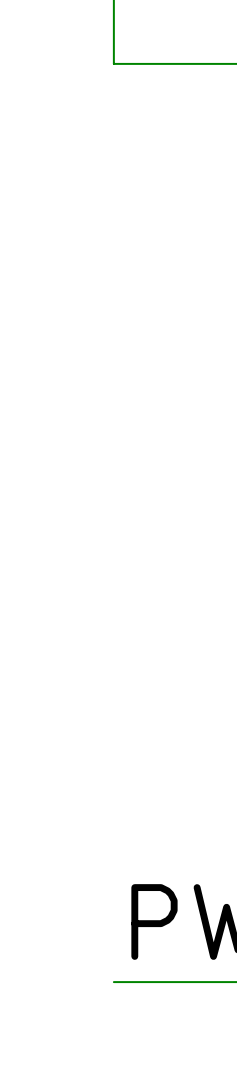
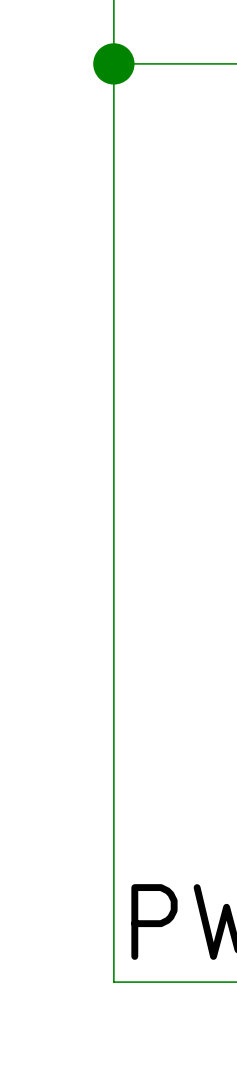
wire: none -> (113, 63) (113, 982)
junction: none -> (113, 63)

